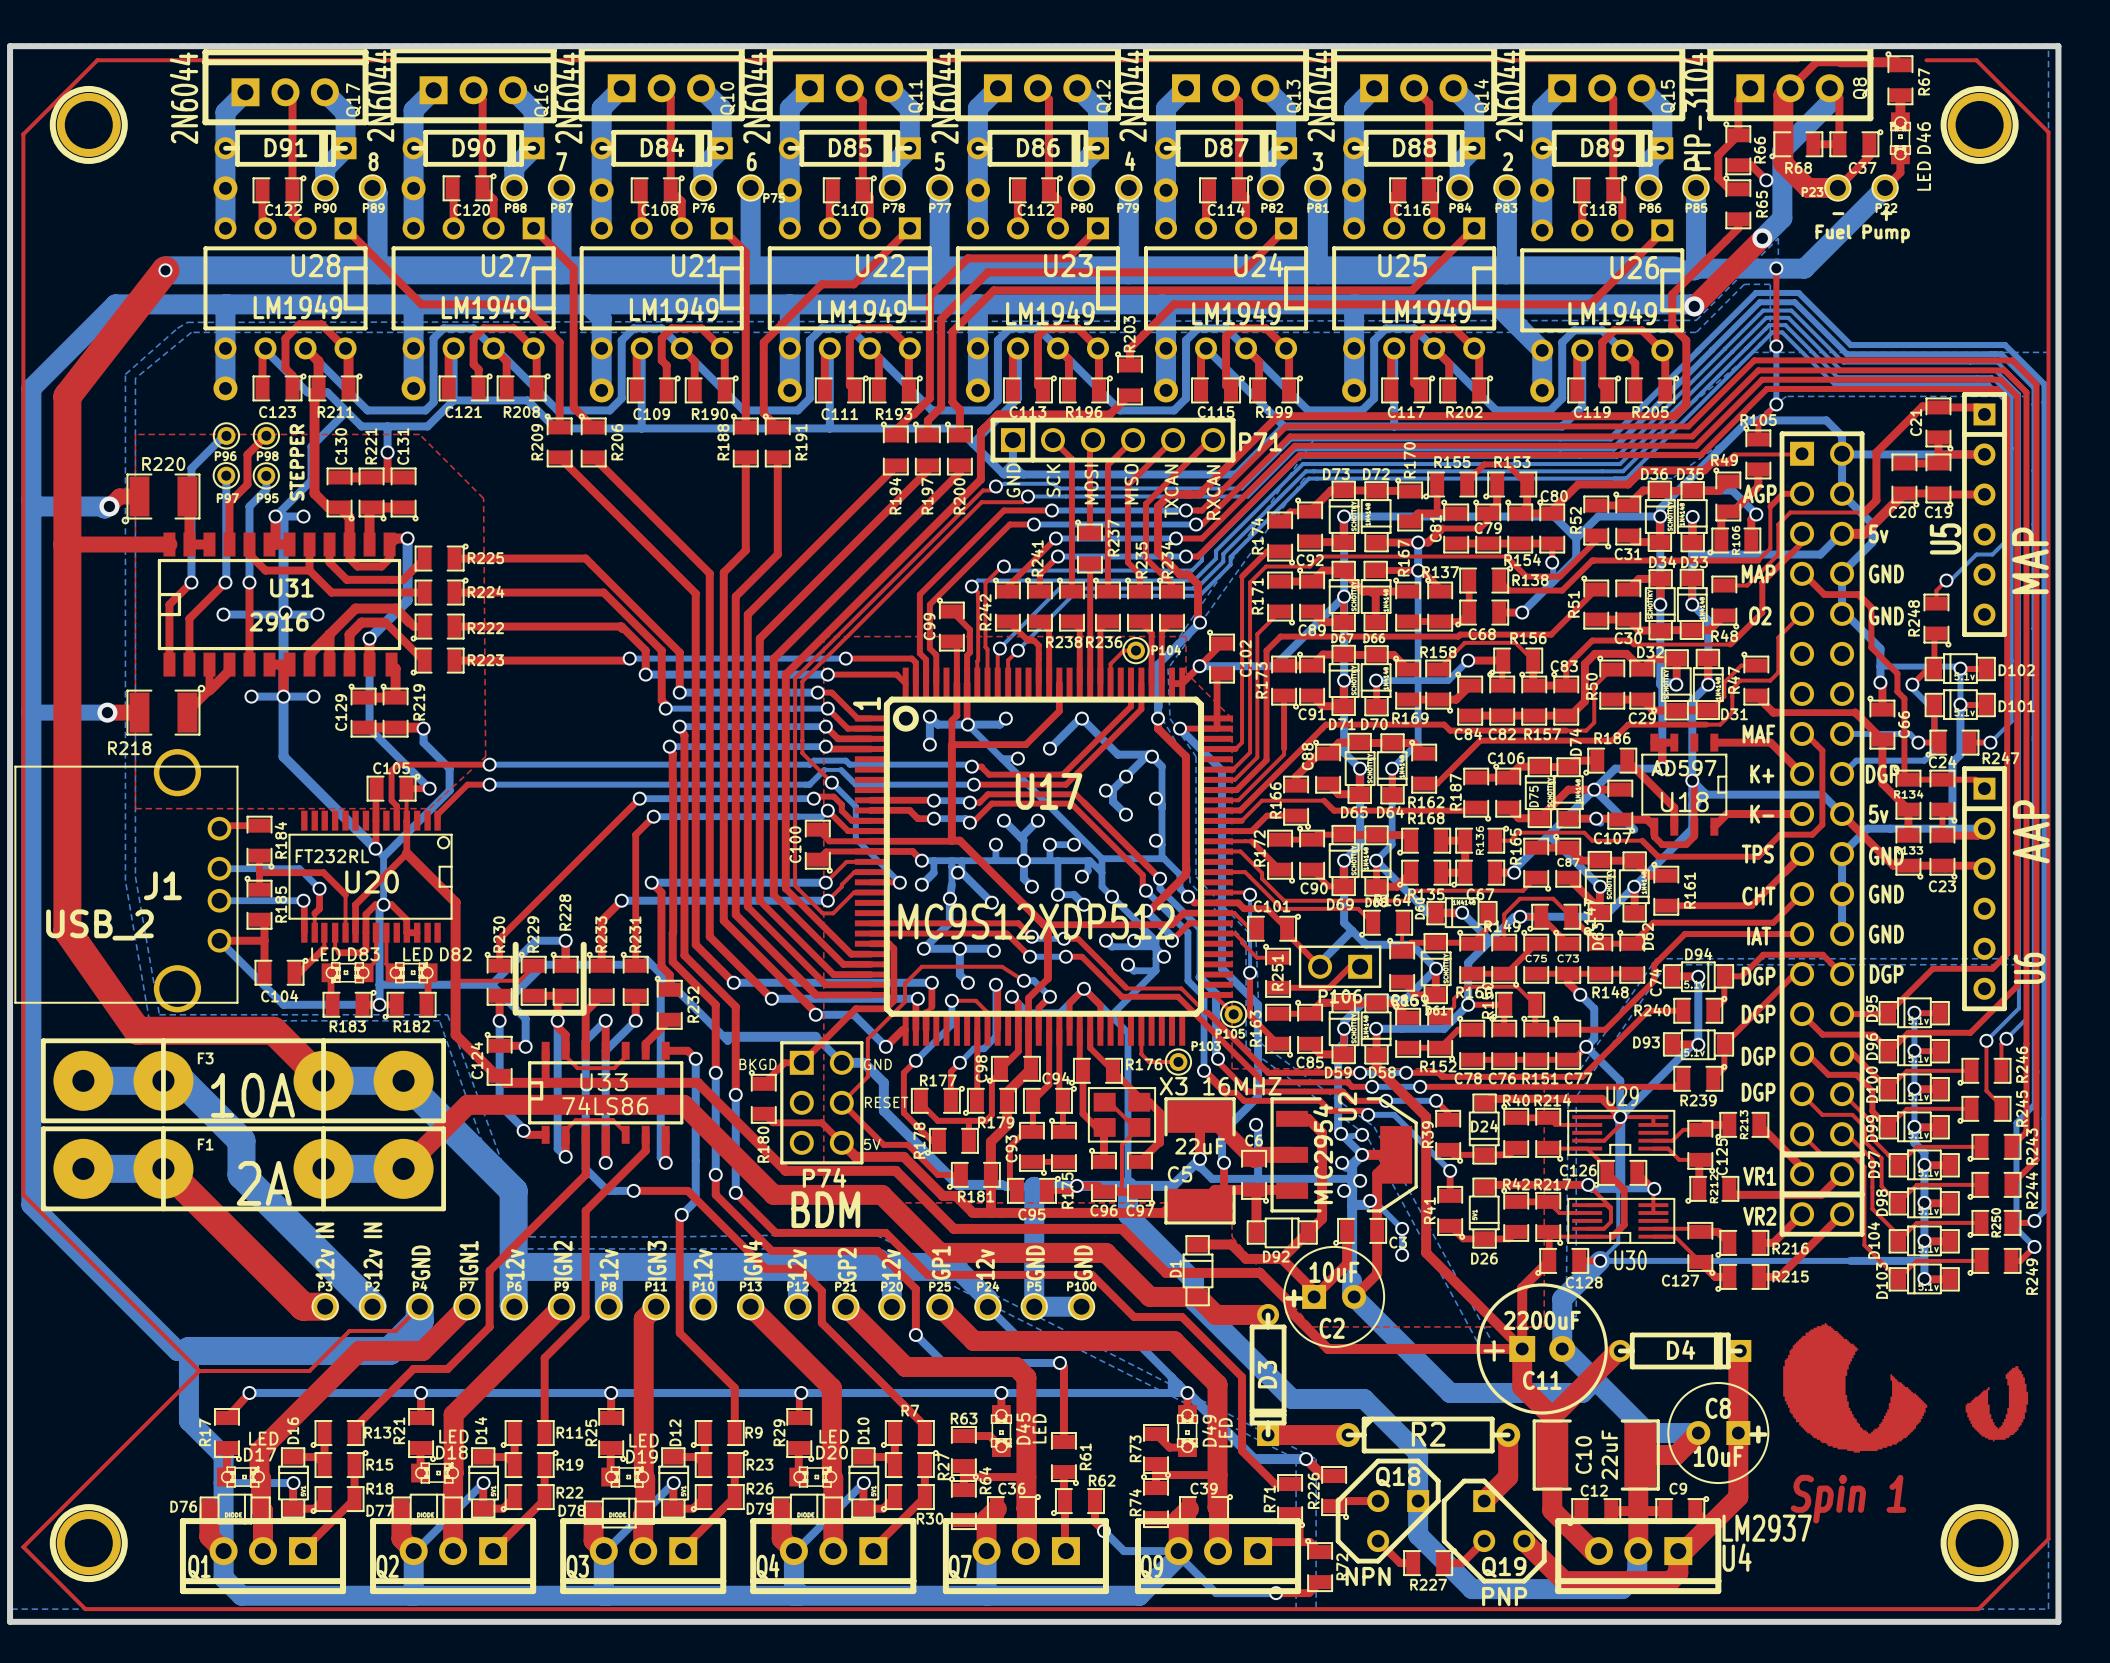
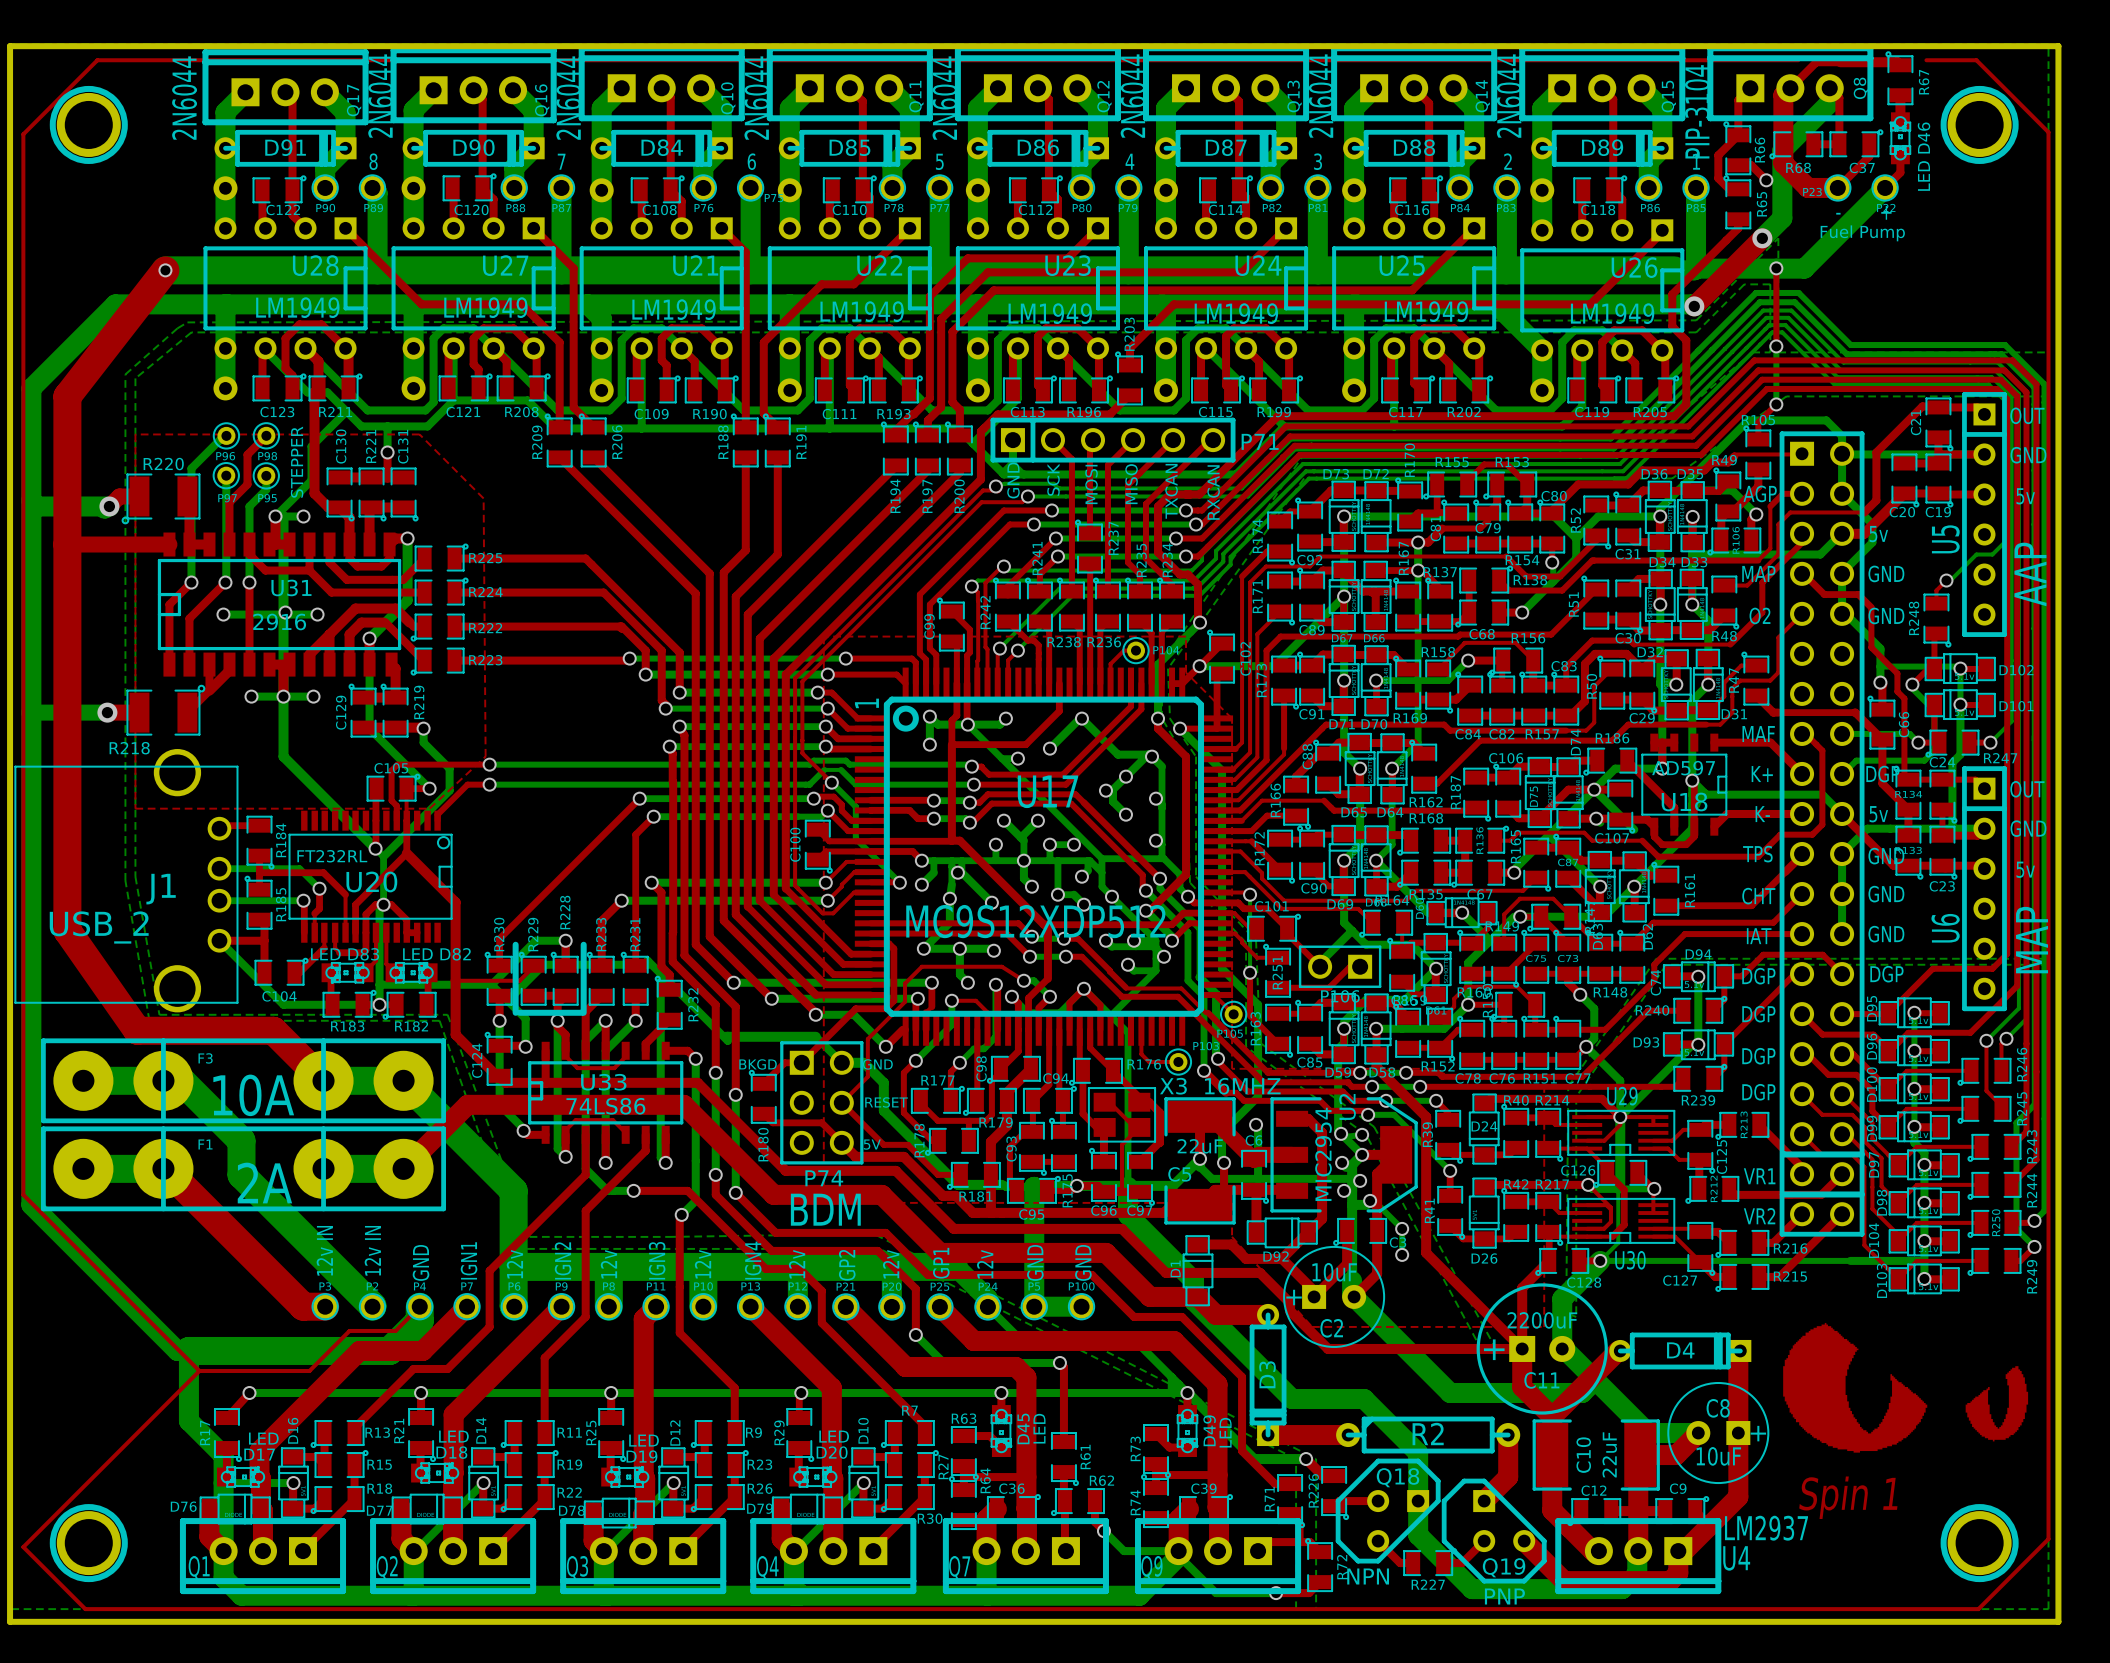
text: none -> OUT (2027, 415)
text: none -> GND (2028, 455)
text: none -> 5v (2025, 496)
text position: MAP (2030, 560) -> MAP (2032, 940)
text: none -> OUT (2027, 789)
text: none -> GND (2028, 828)
text position: AAP (2031, 831) -> AAP (2030, 574)
text: none -> 5v (2025, 869)
U6 name position: U6 (2029, 968) -> U6 (1945, 928)

